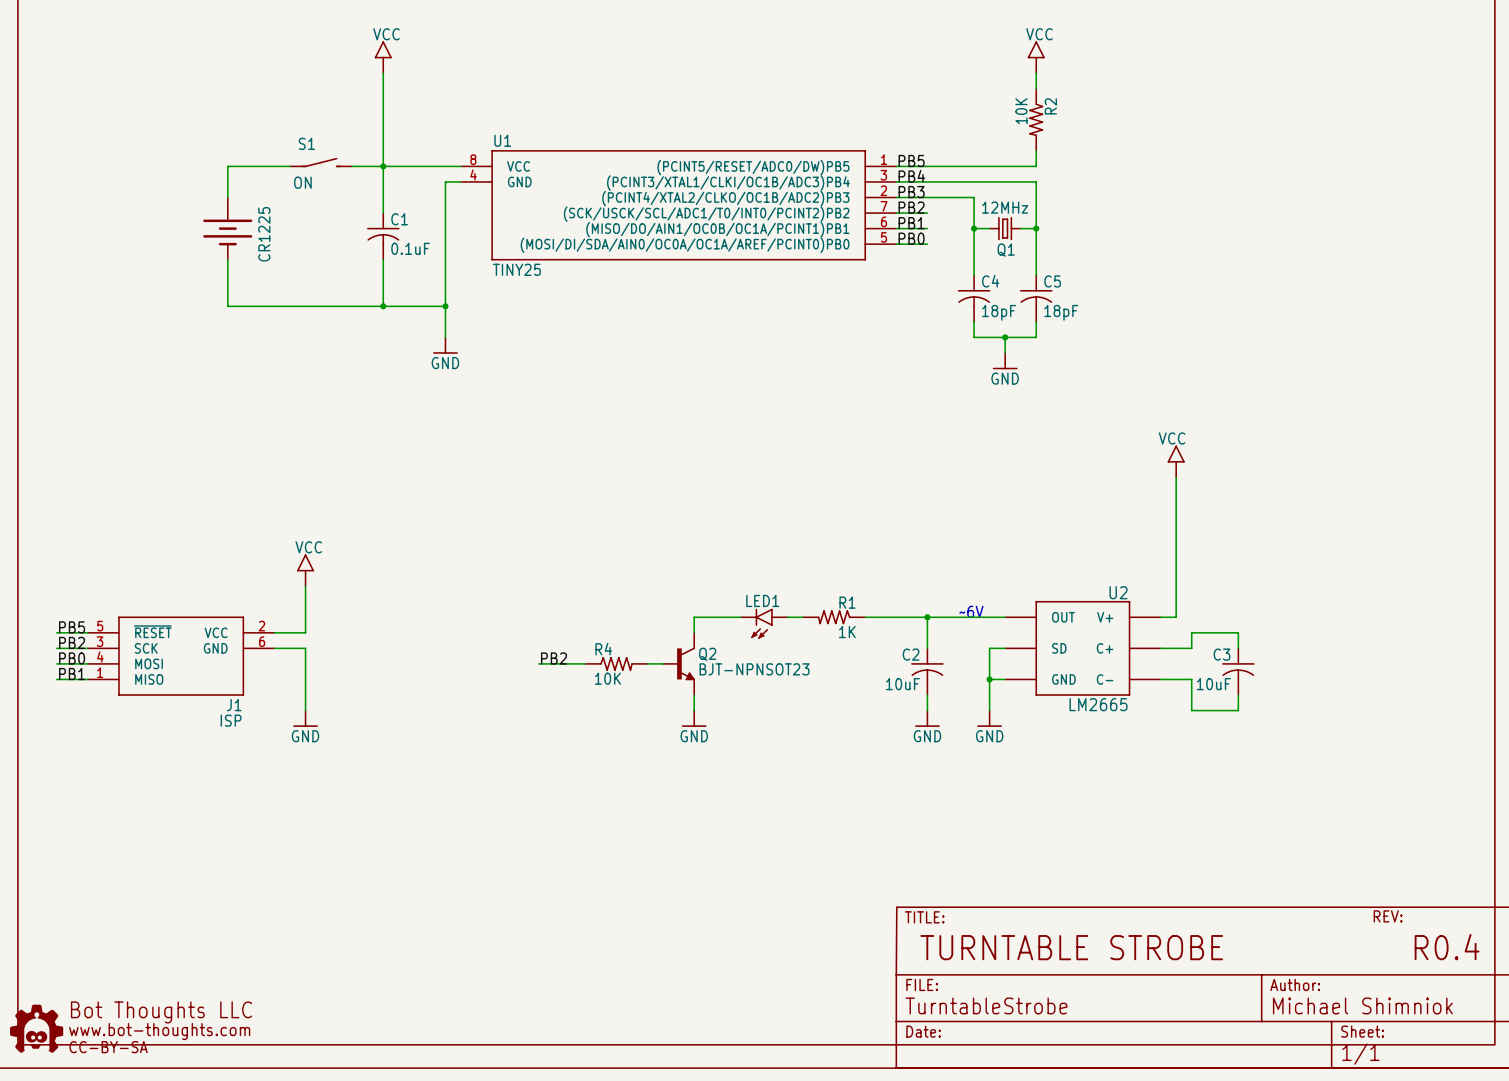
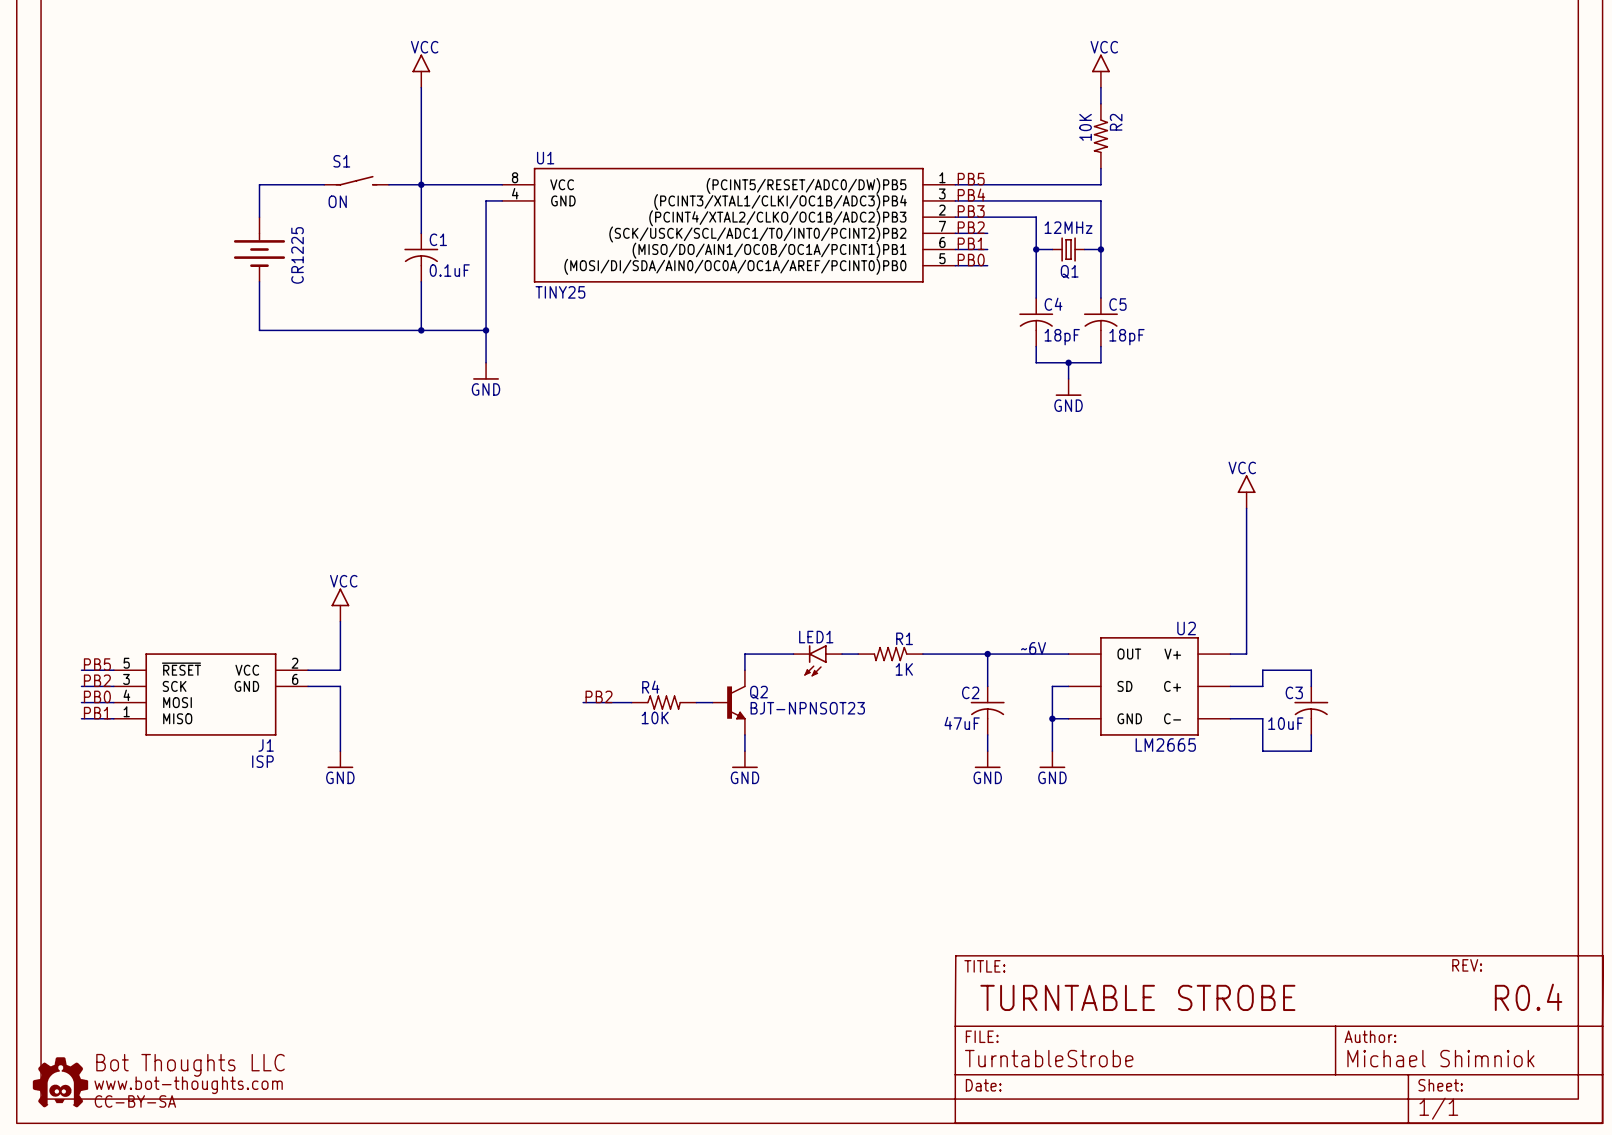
C2 value: 10uF (902, 684) -> 47uF (962, 723)

